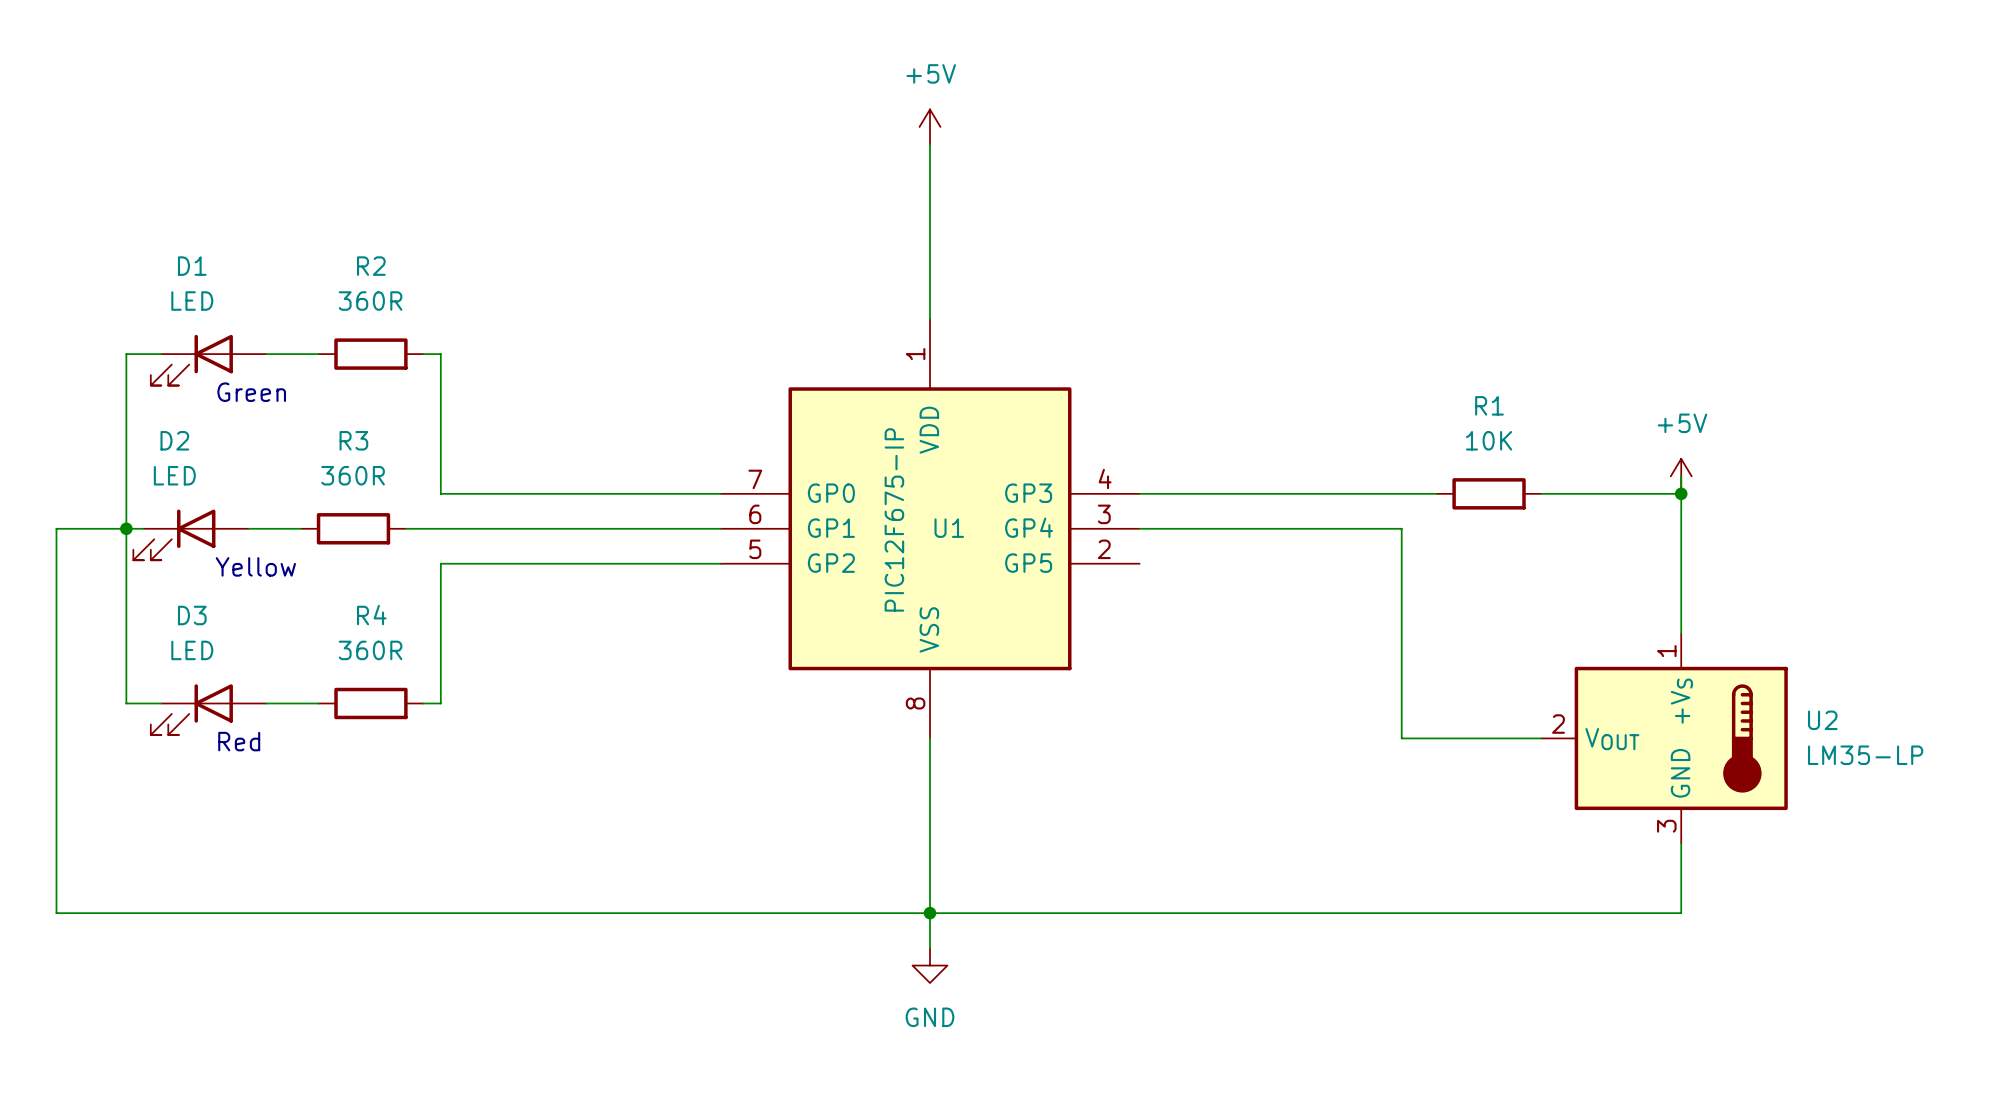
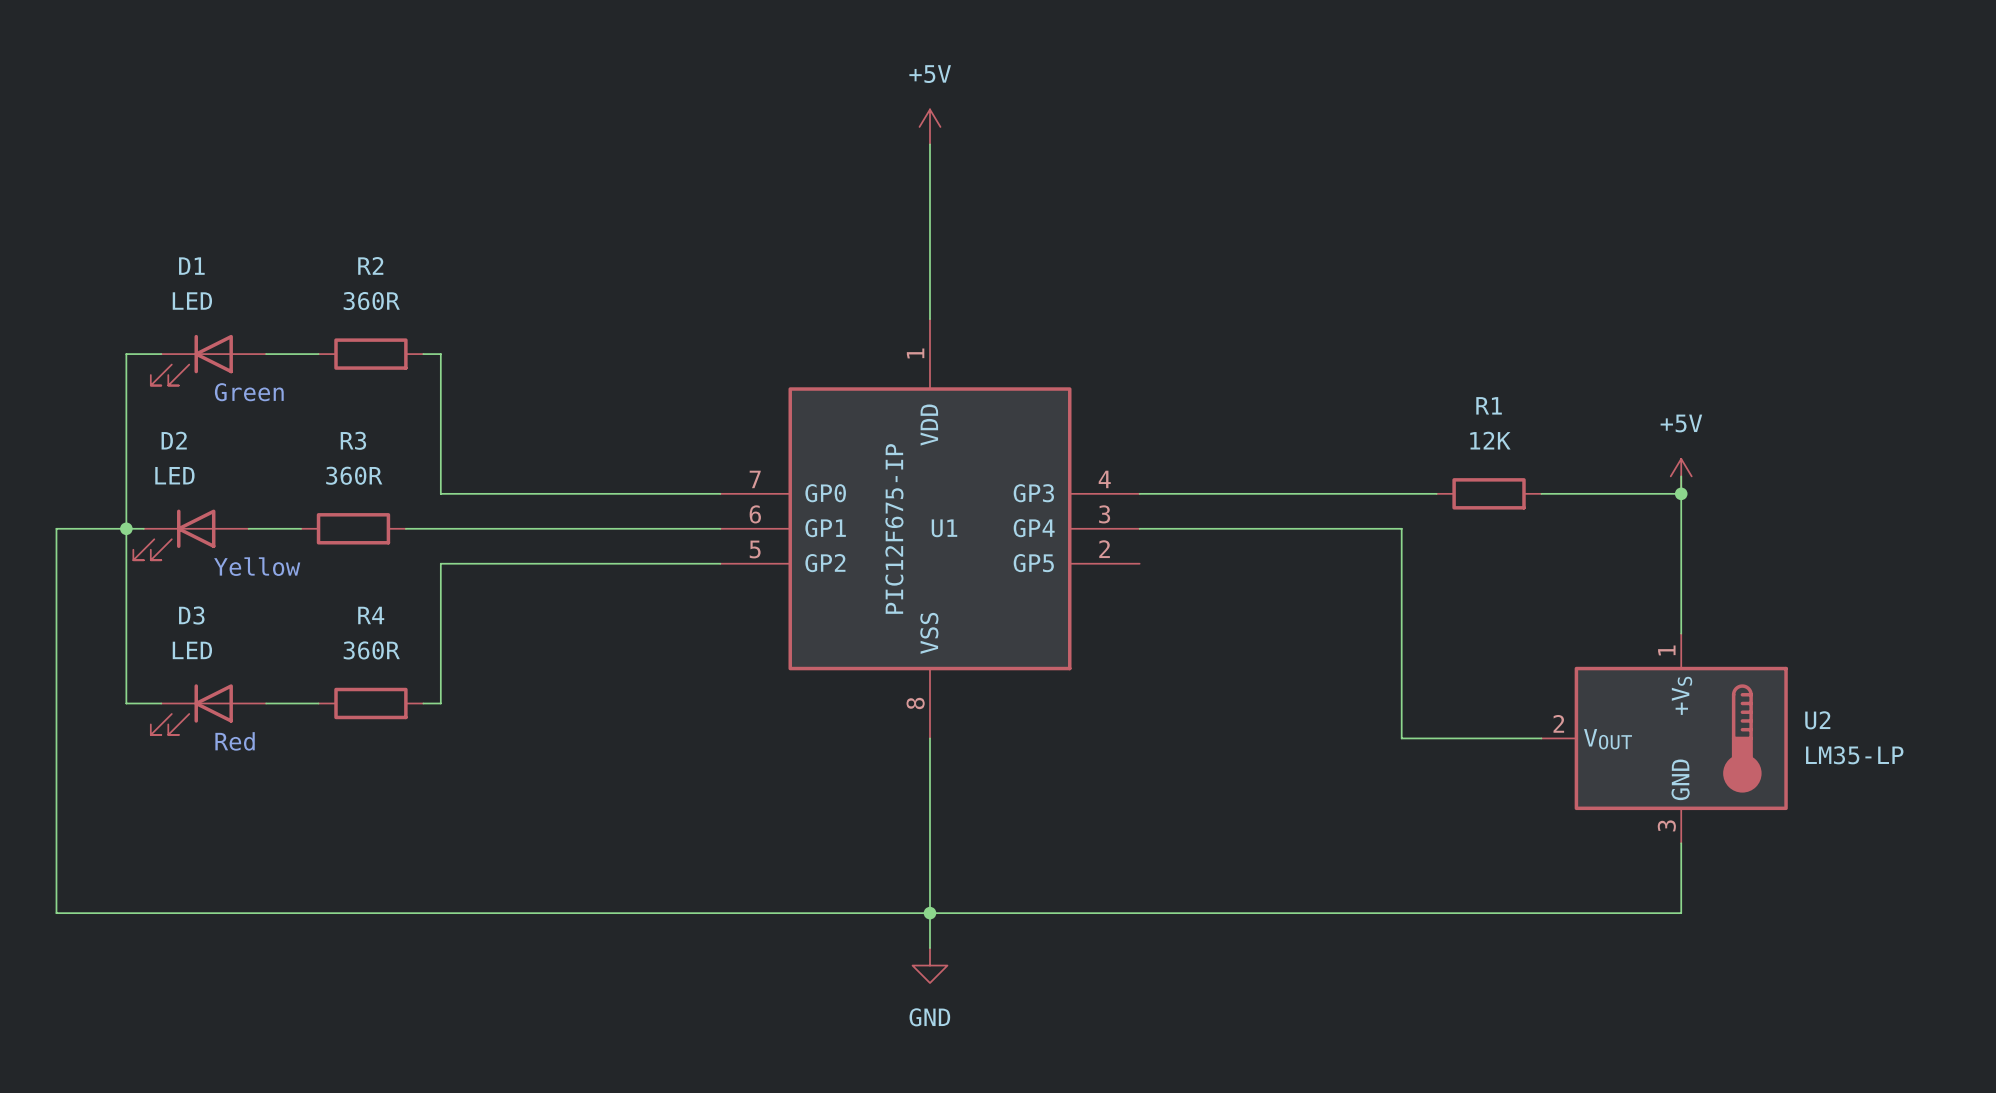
R1 value: 10K (1489, 440) -> 12K (1490, 440)

